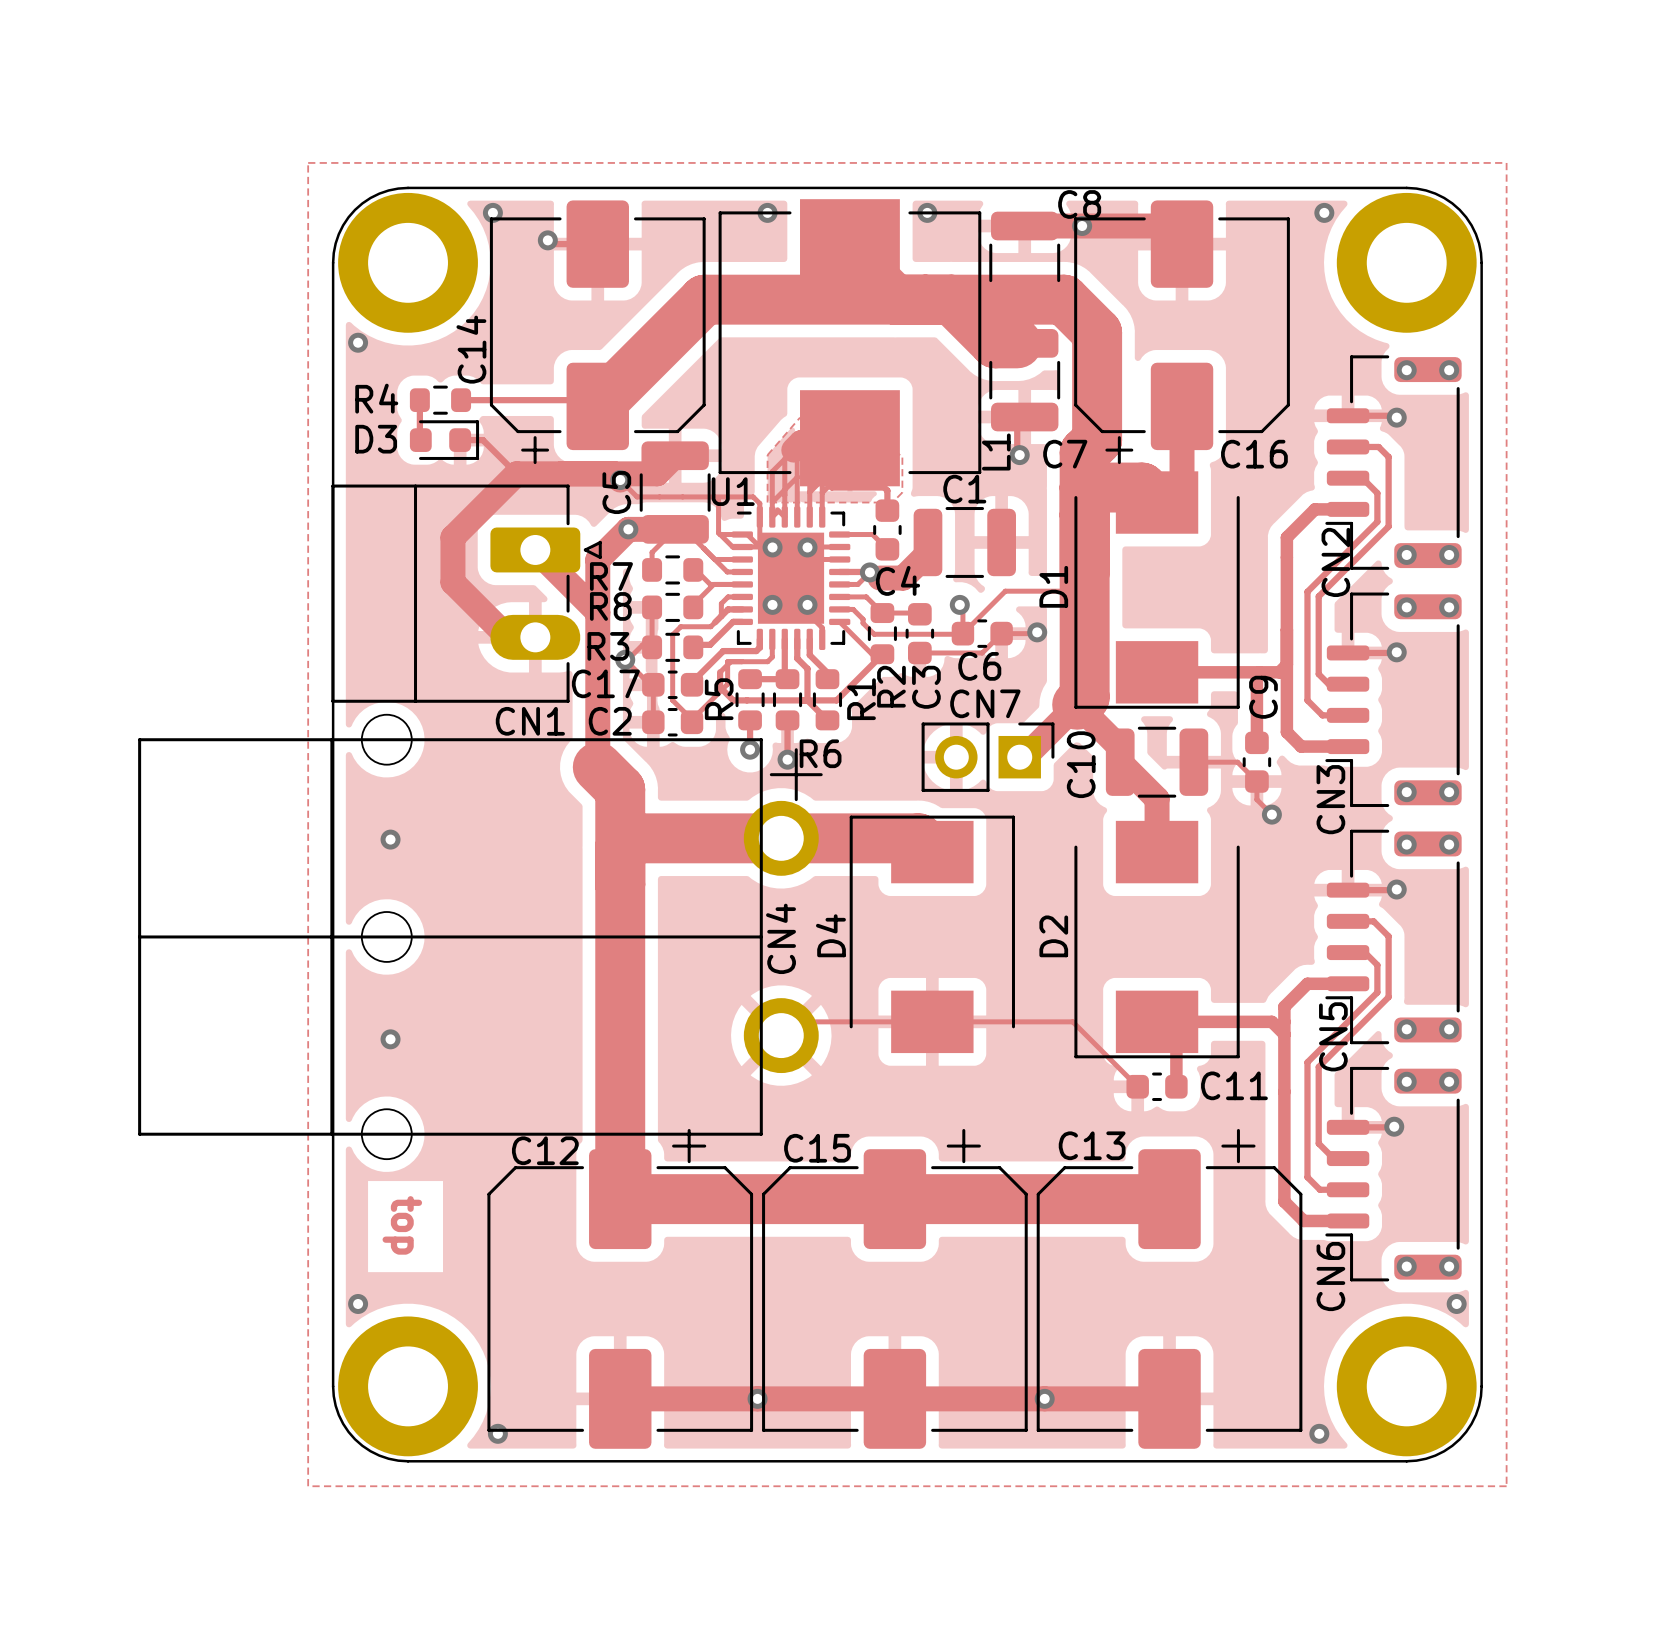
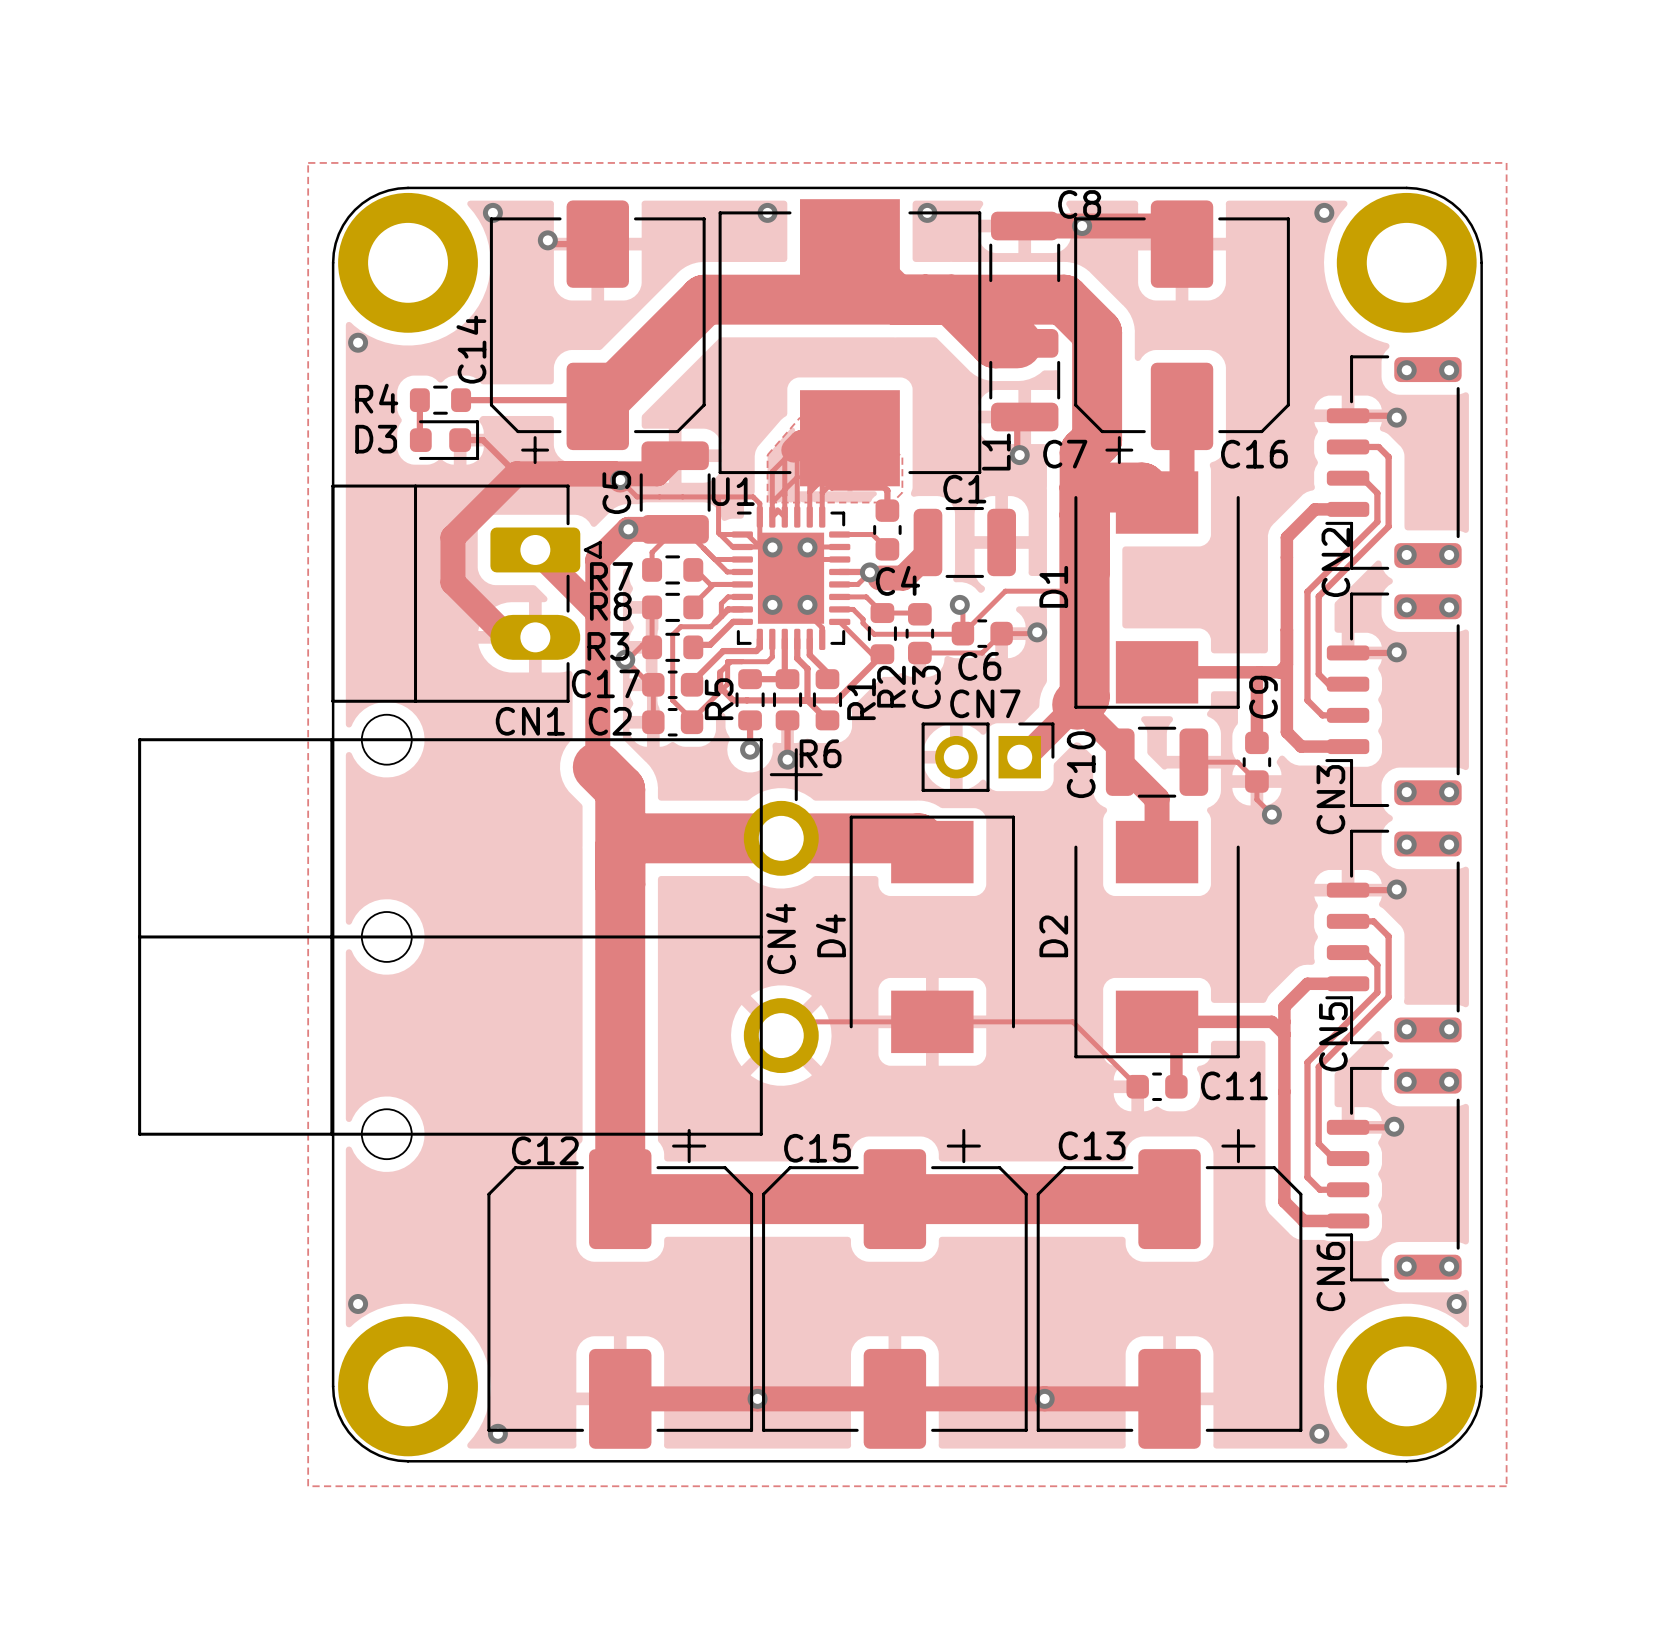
via: (390, 839) -> none
via: (390, 1039) -> none
text: top (402, 1225) -> none

